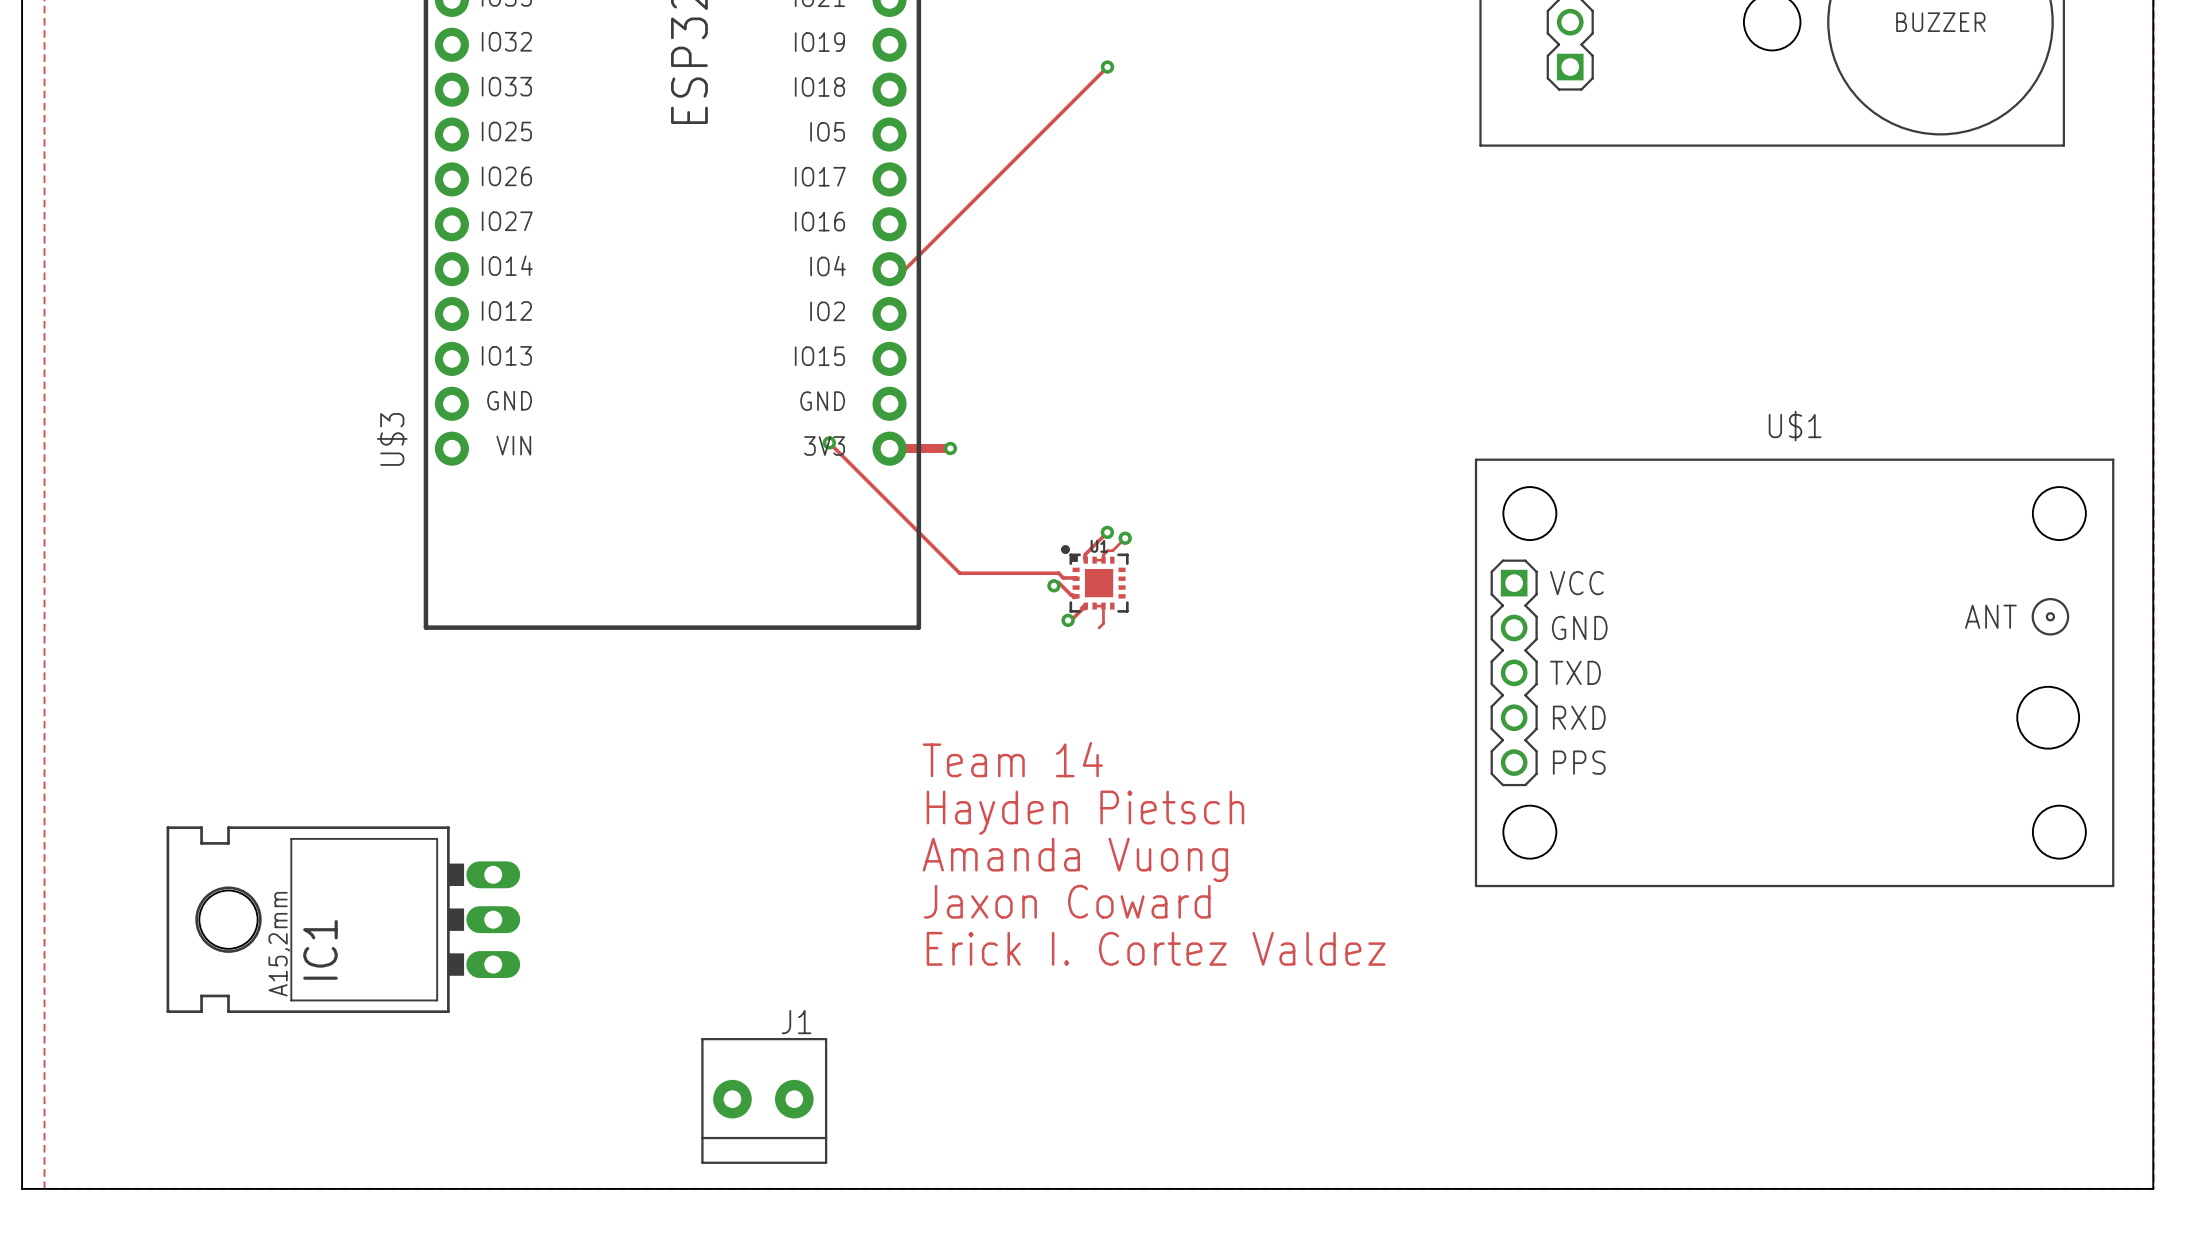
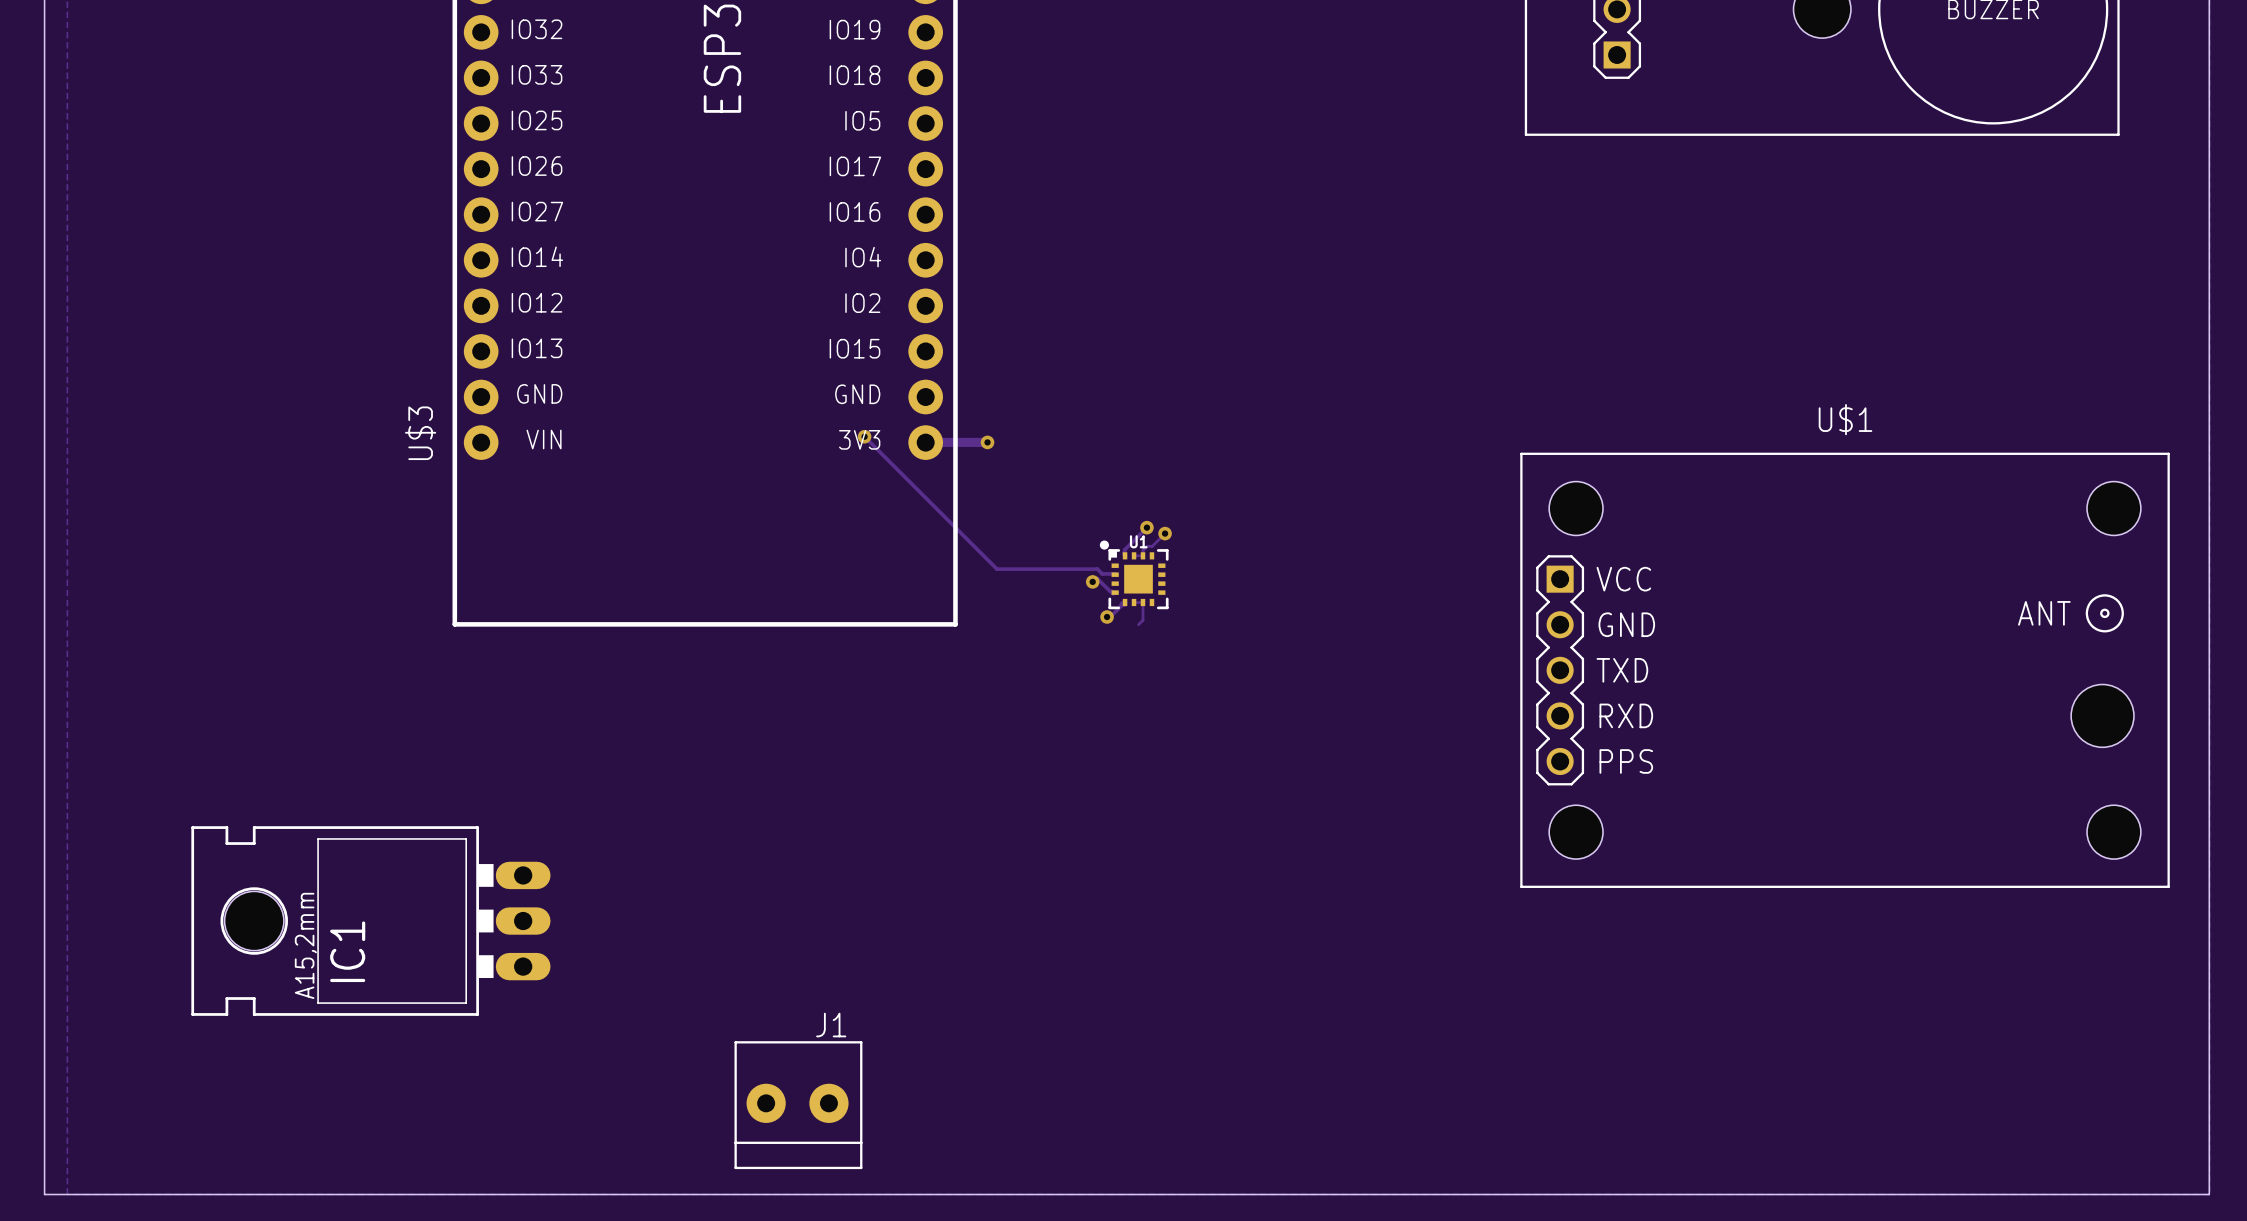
track: (1107, 67) (905, 268) (889, 269) -> none
via: (1107, 67) -> none
text: Team 14 (1012, 759) -> none
text: Hayden Pietsch (1085, 812) -> none
text: Amanda Vuong (1075, 859) -> none
text: Jaxon Coward (1067, 901) -> none
text: Erick I. Cortez Valdez (1156, 948) -> none

